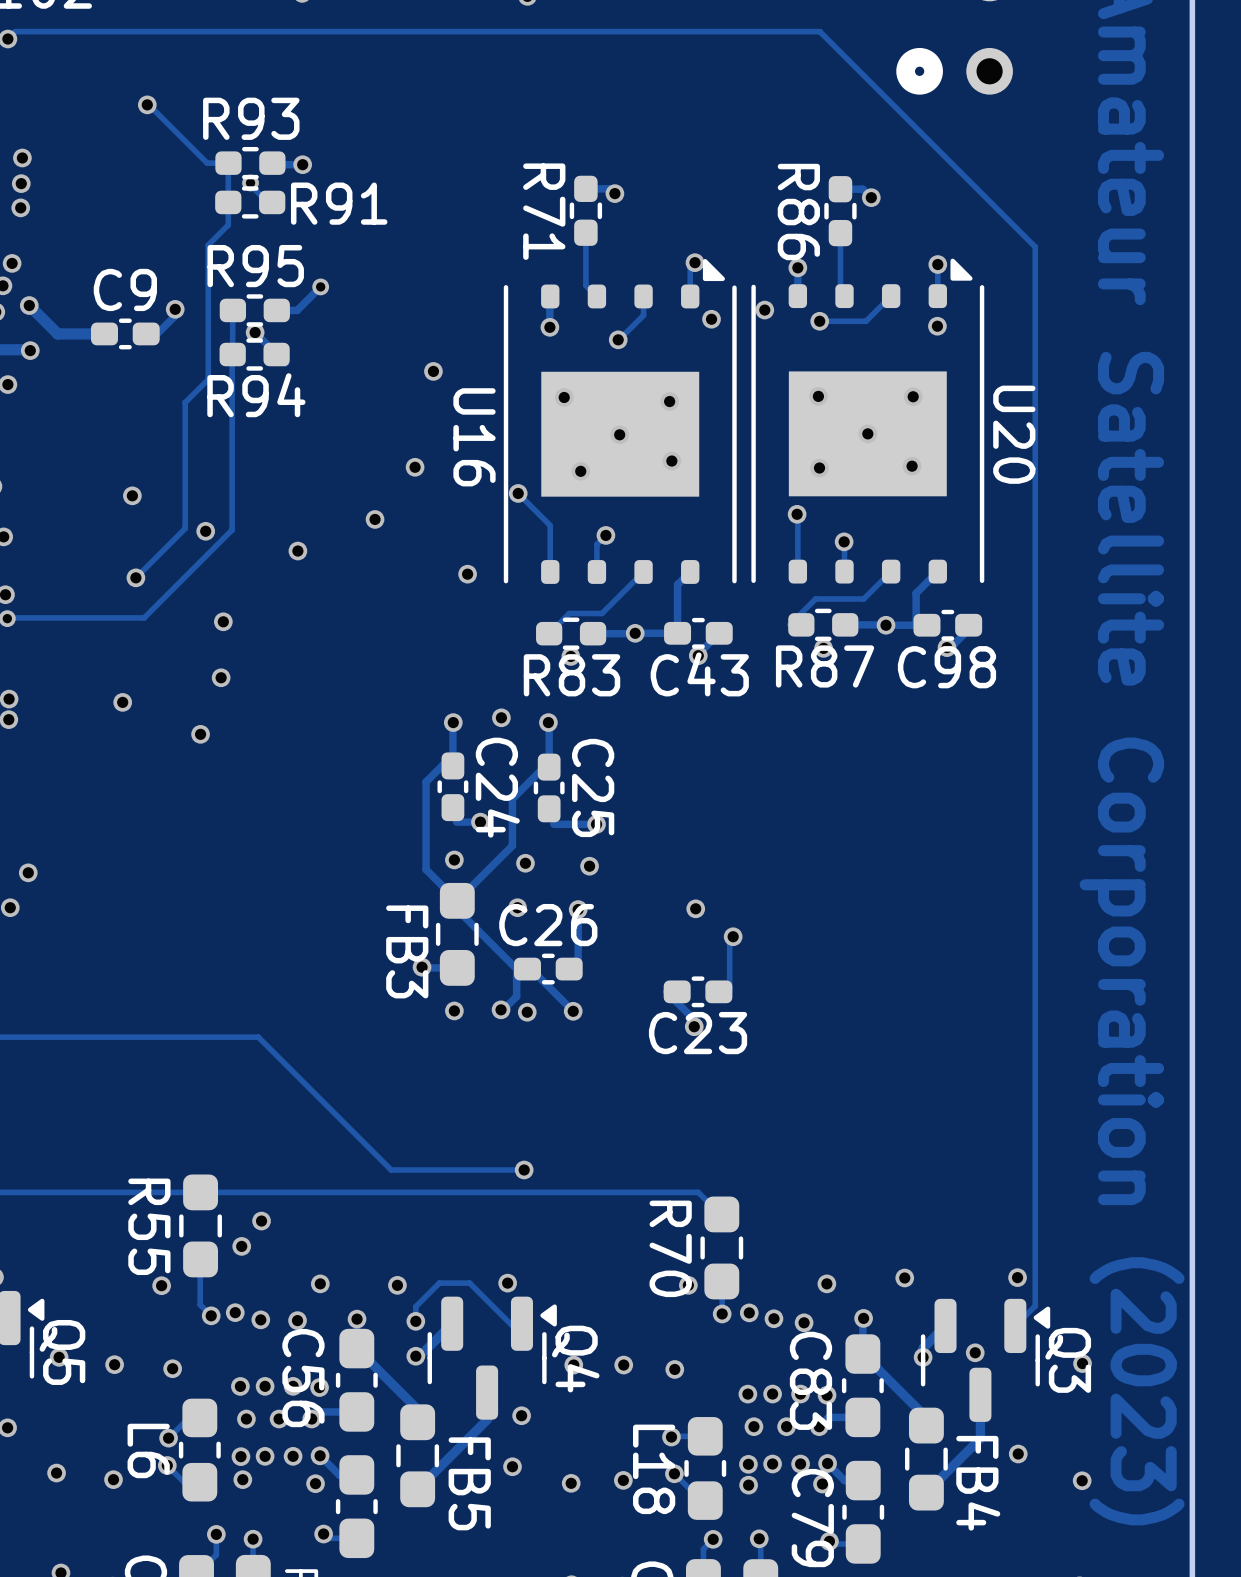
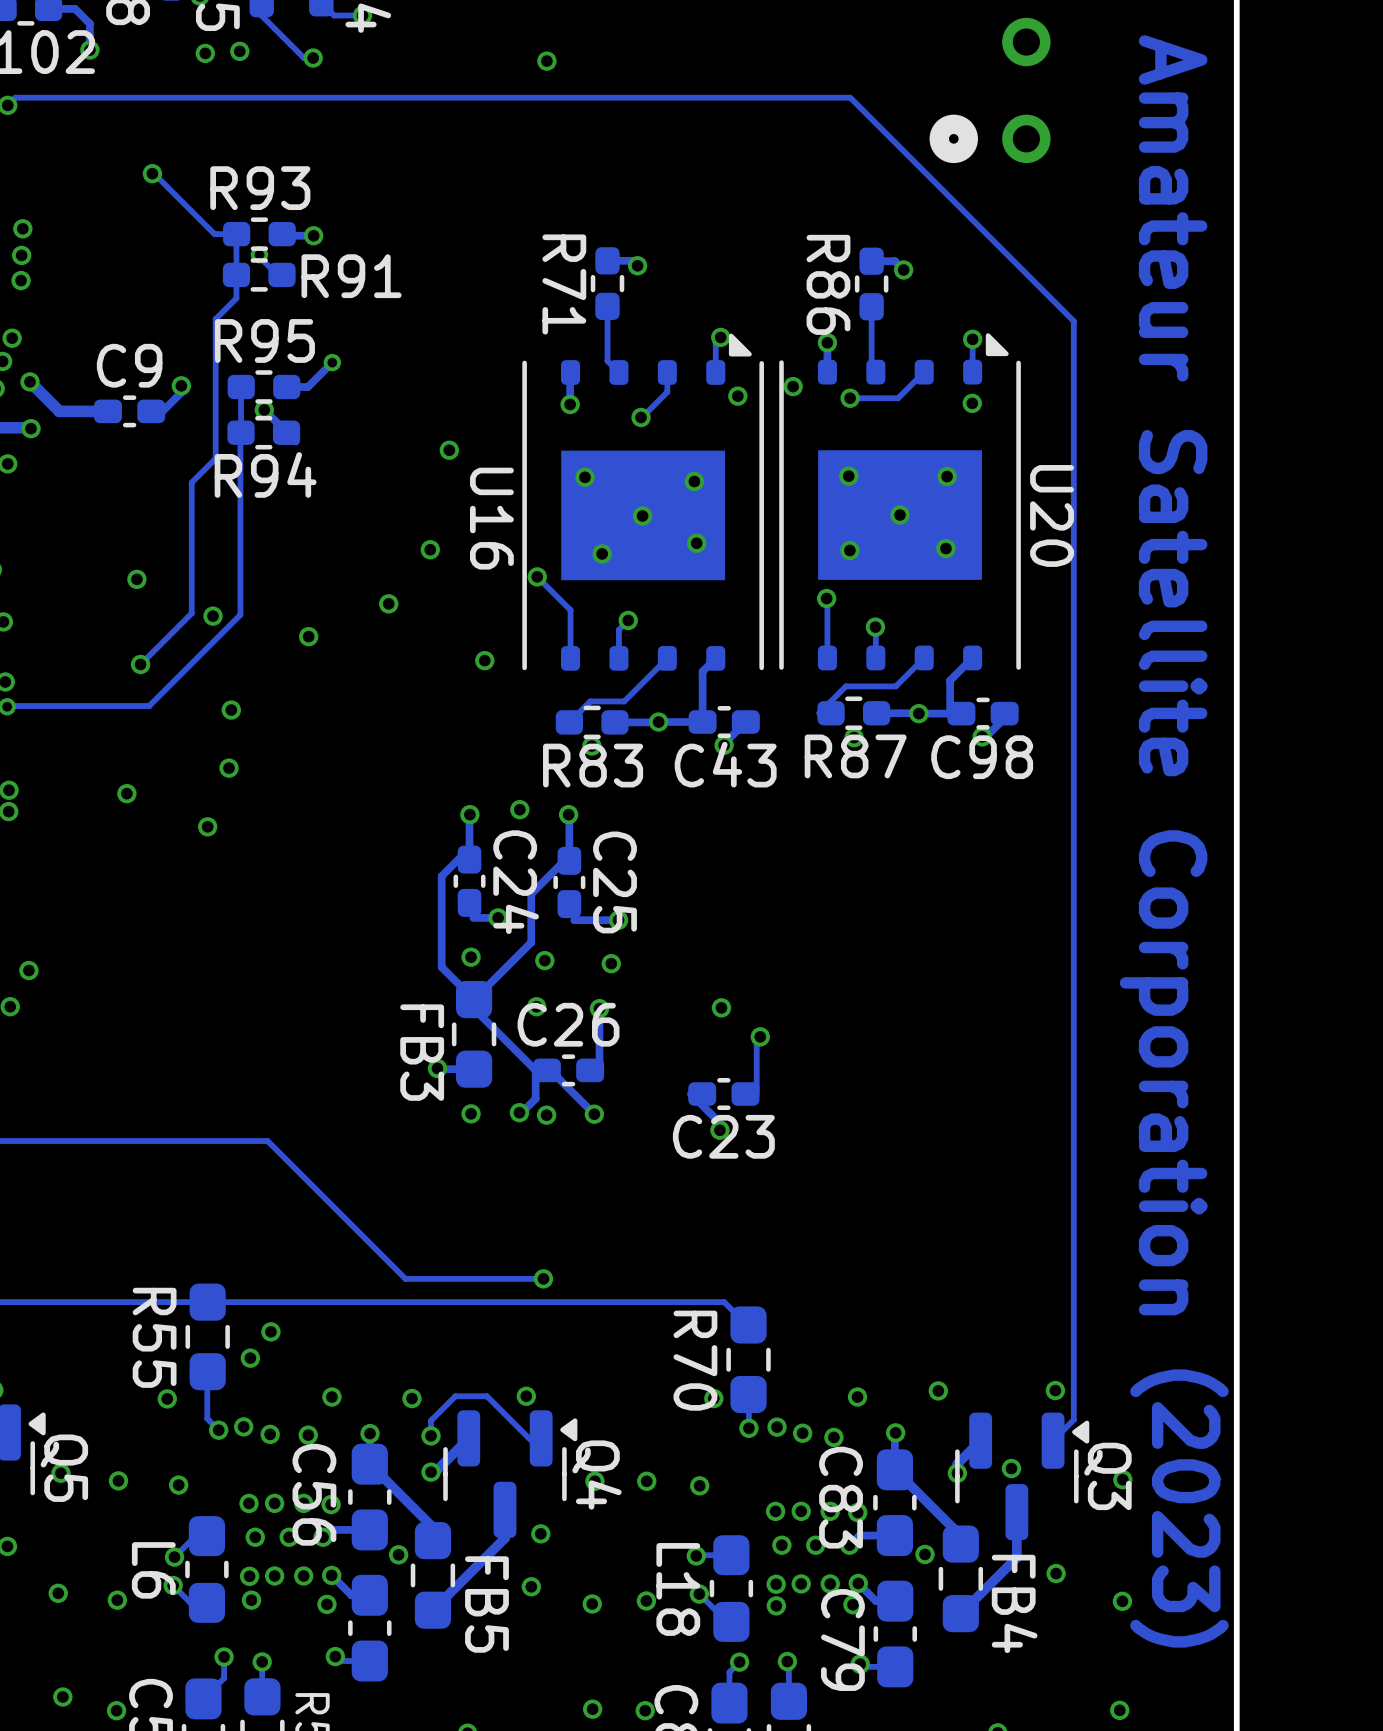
via: none -> (398, 1554)
via: none -> (925, 1554)

